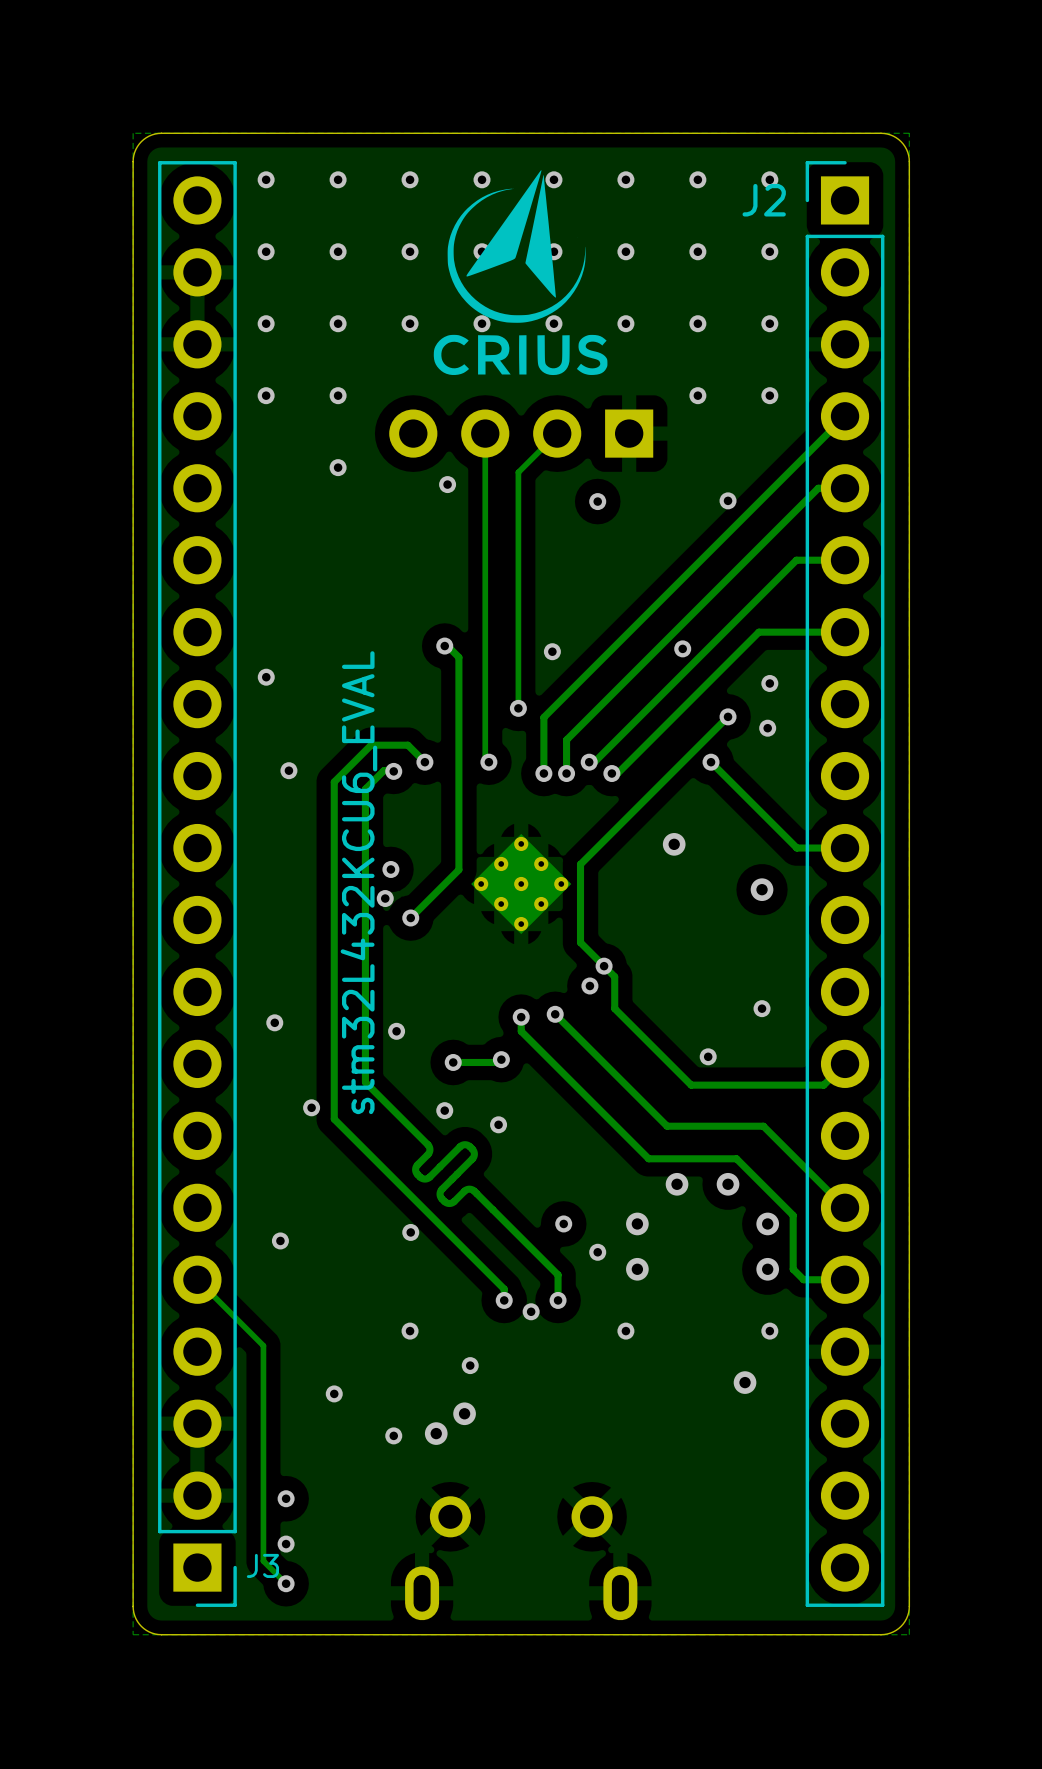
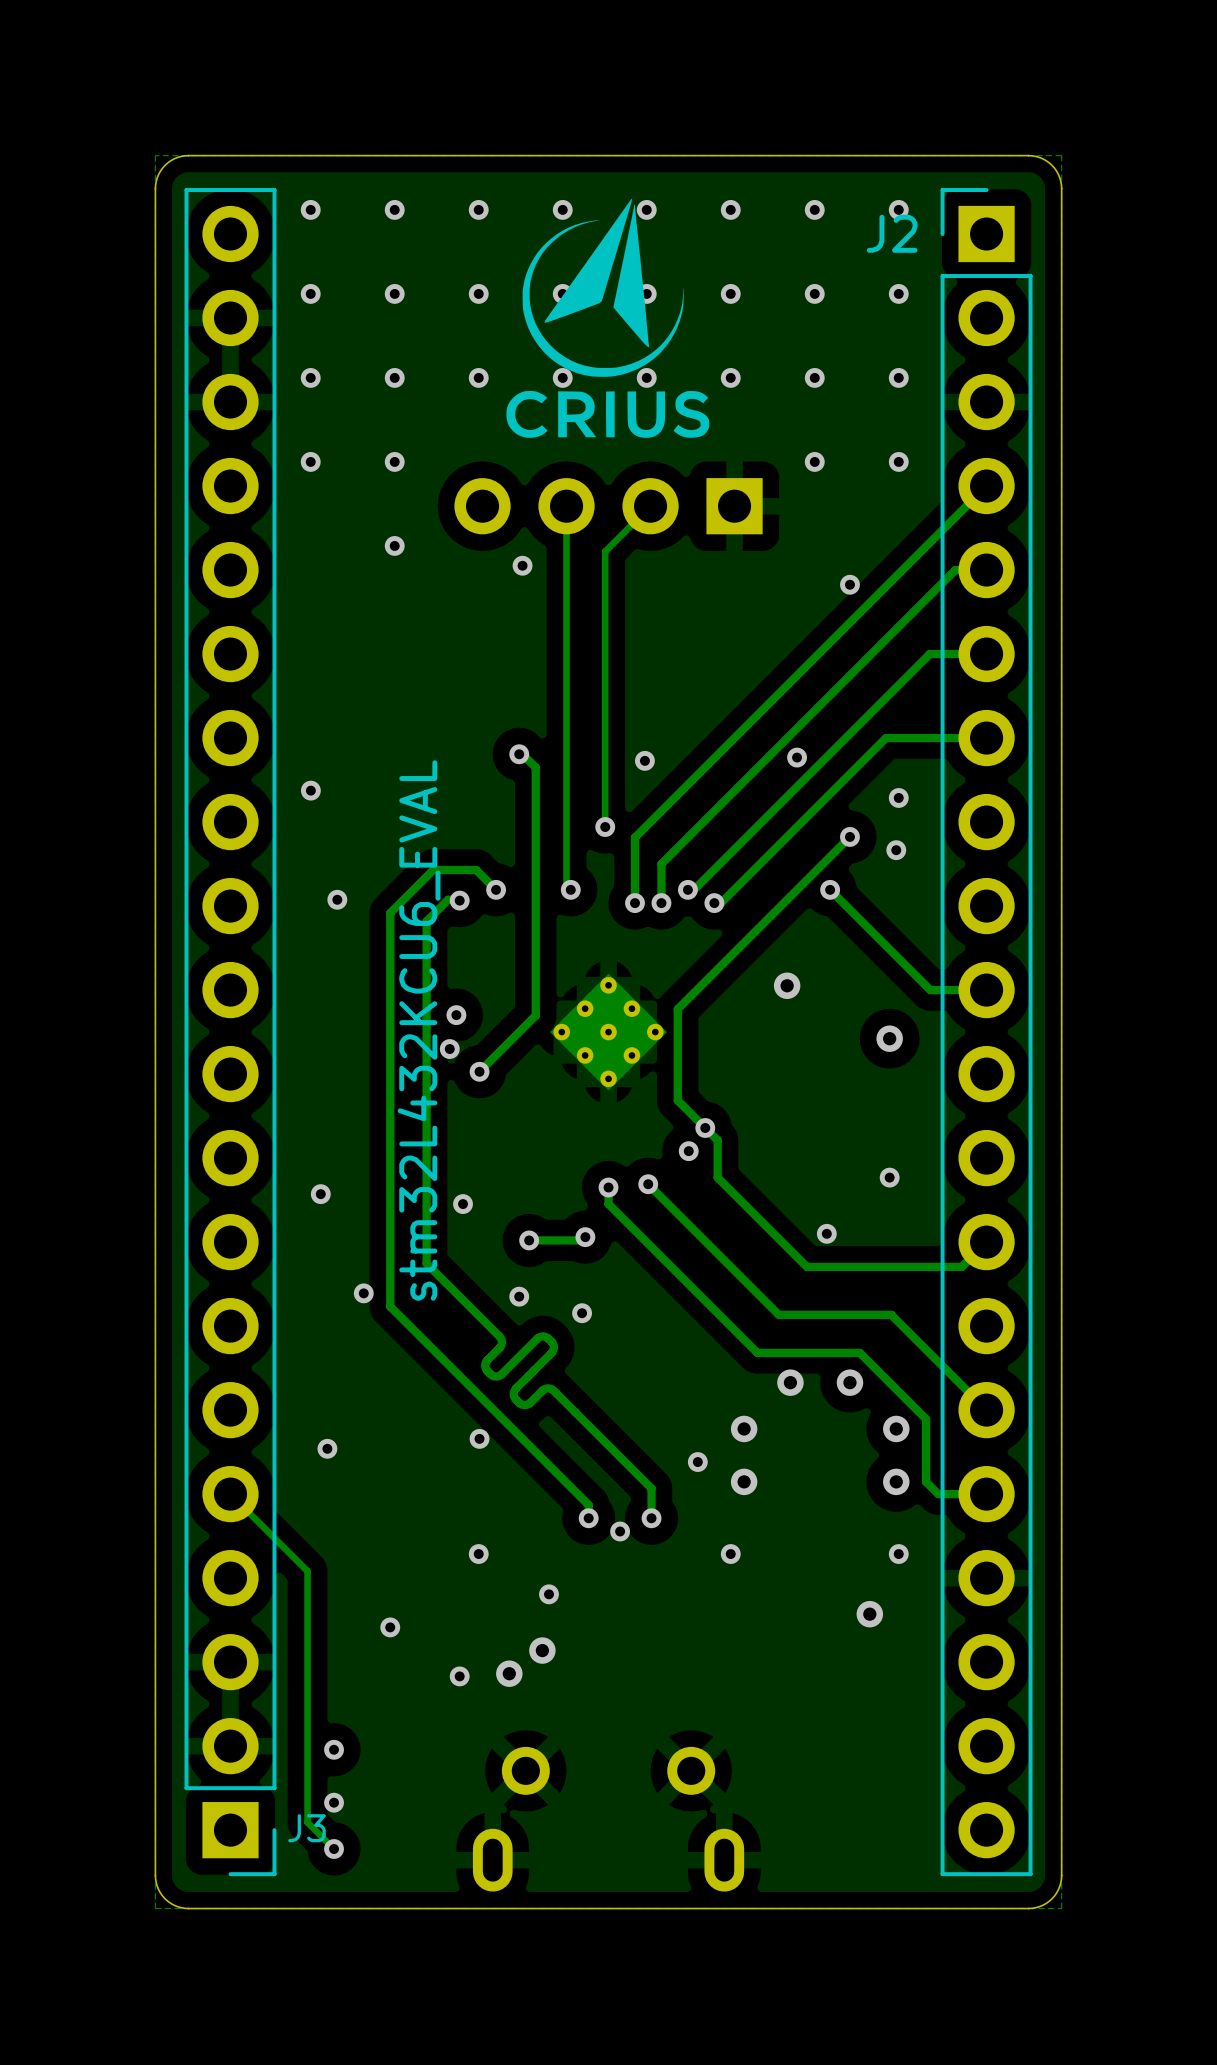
via: (597, 501) -> none
via: (563, 1223) -> none

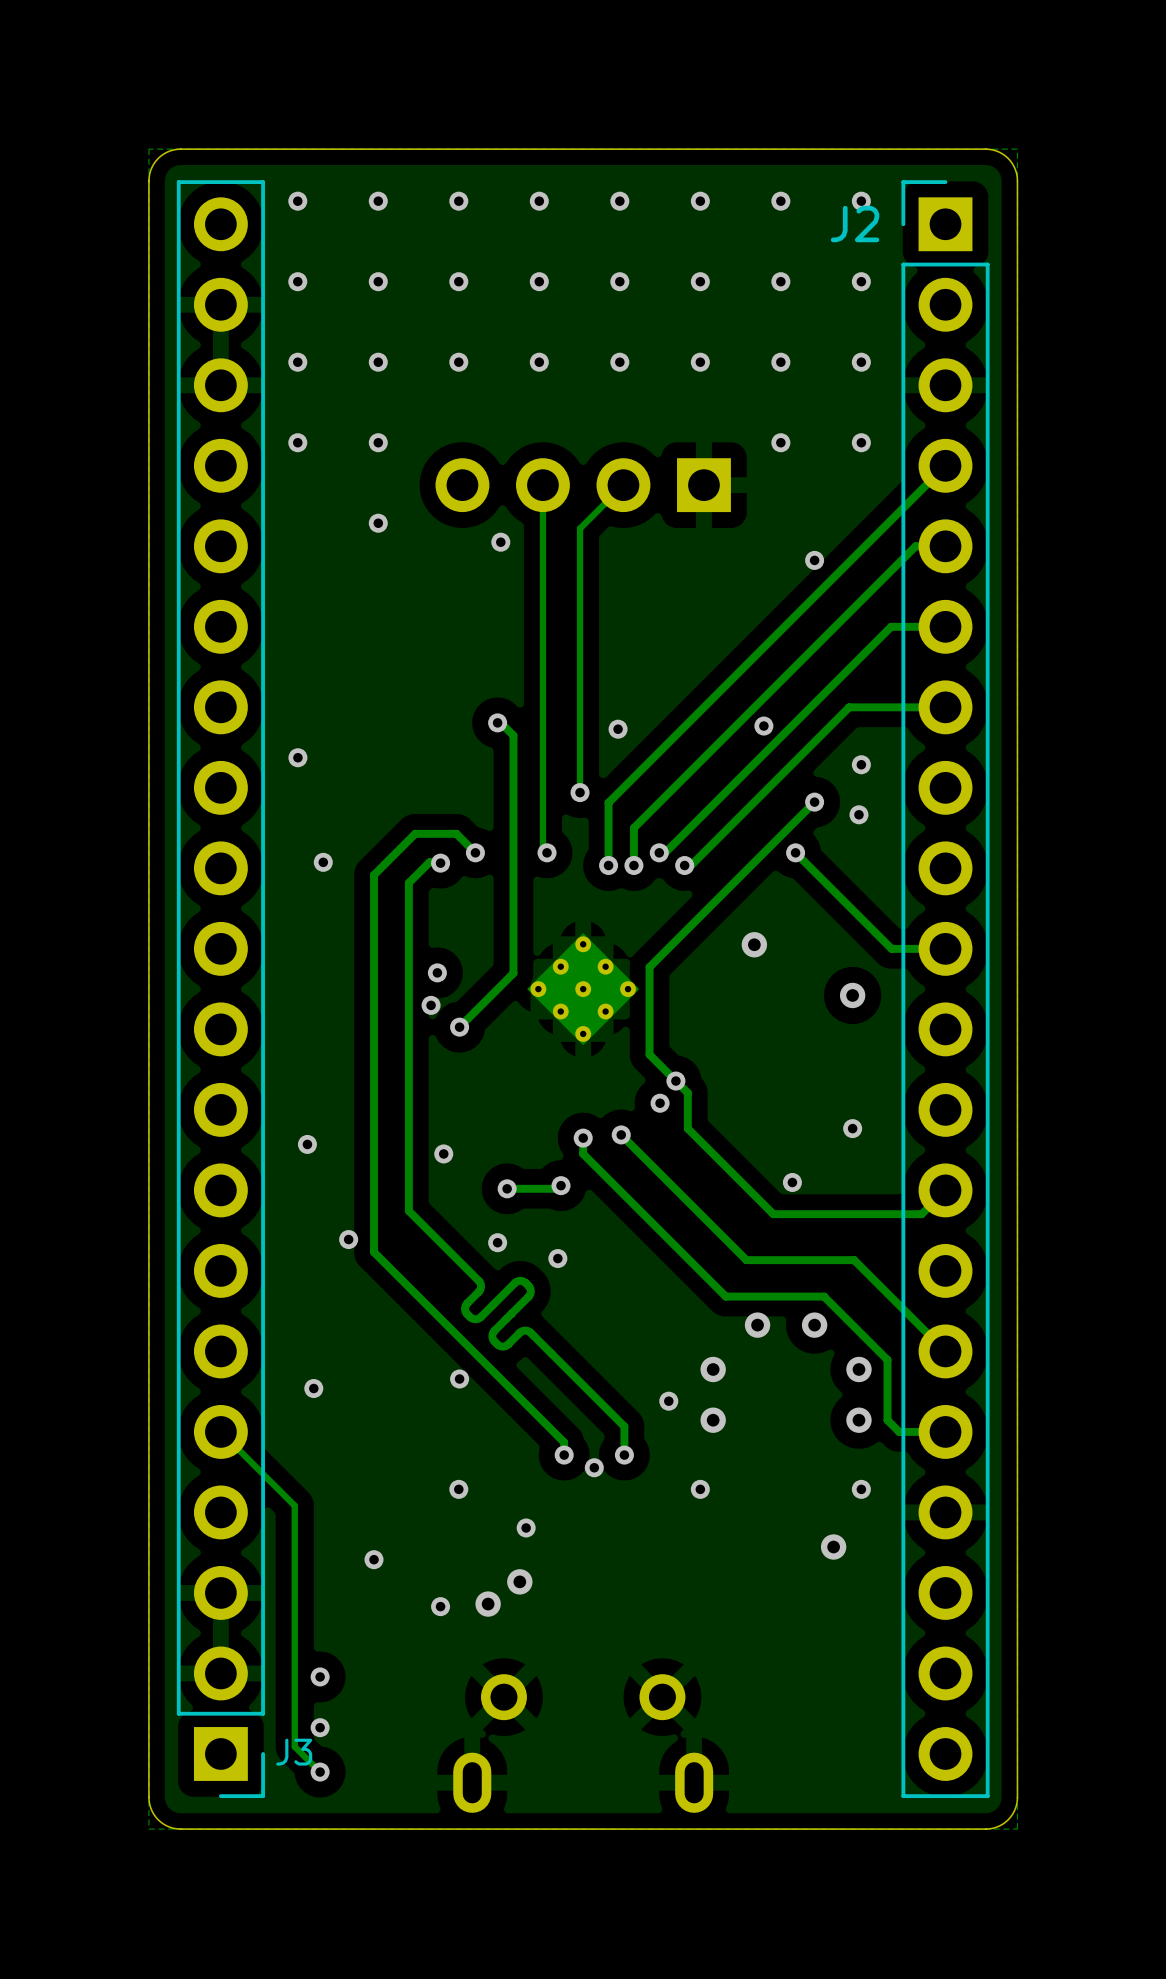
drawing: [506, 198, 710, 438] -> none
text: stm32L432KCU6_EVAL (419, 1030) -> none

